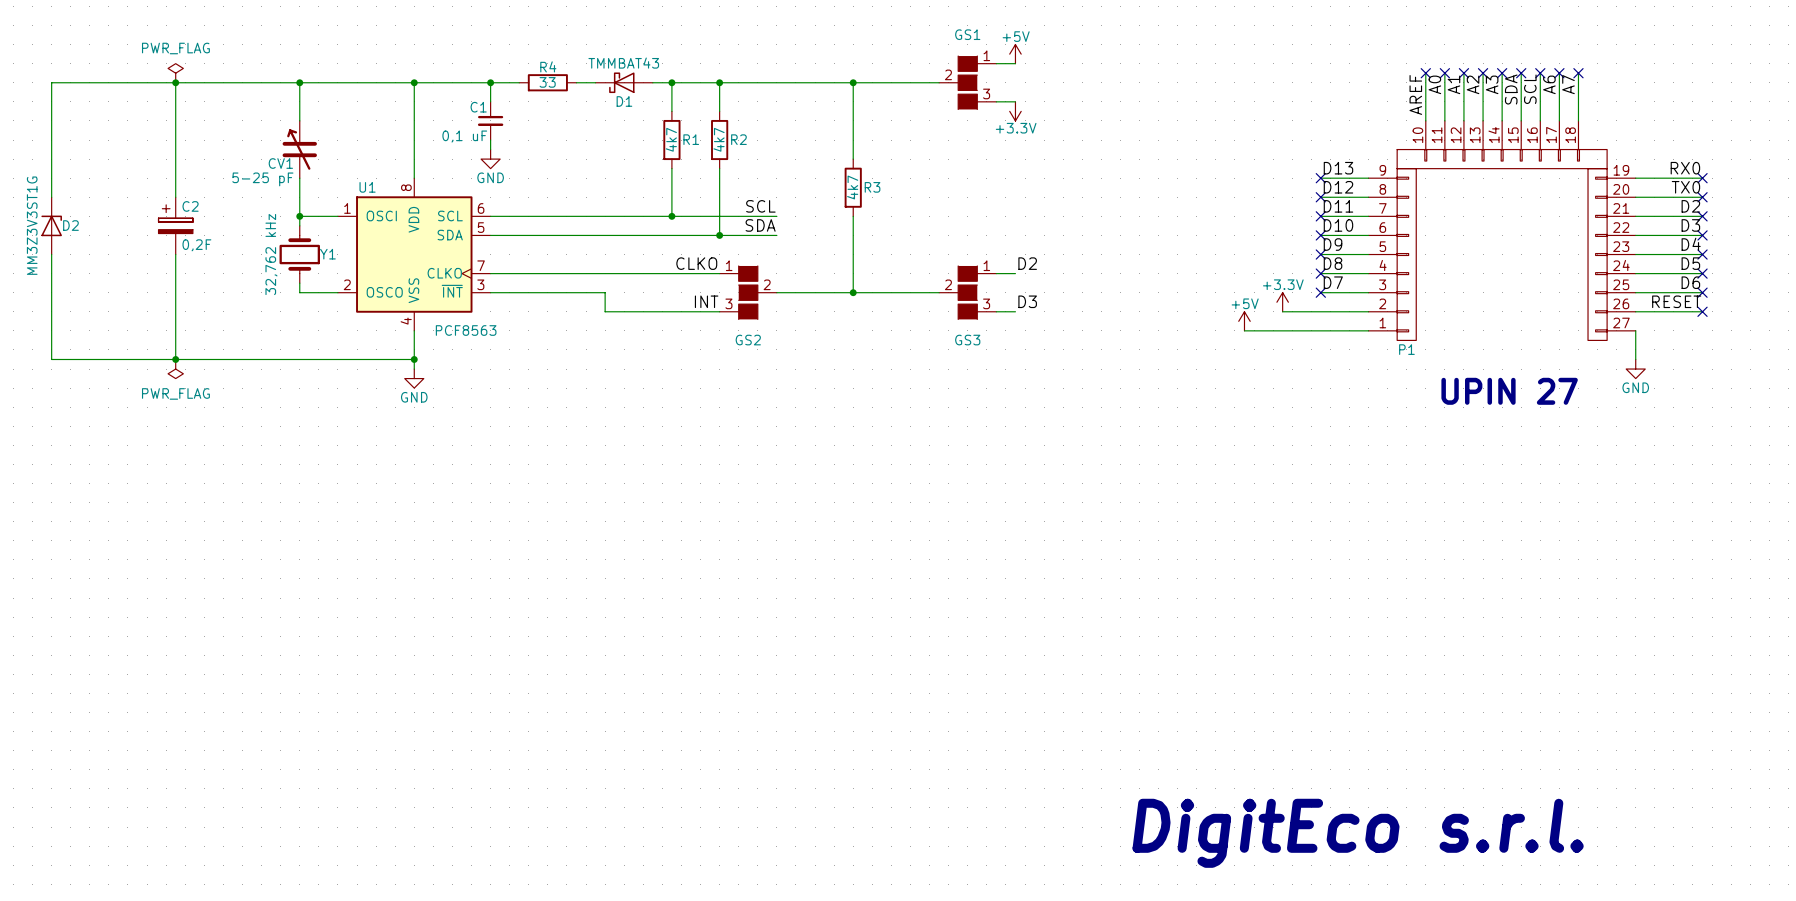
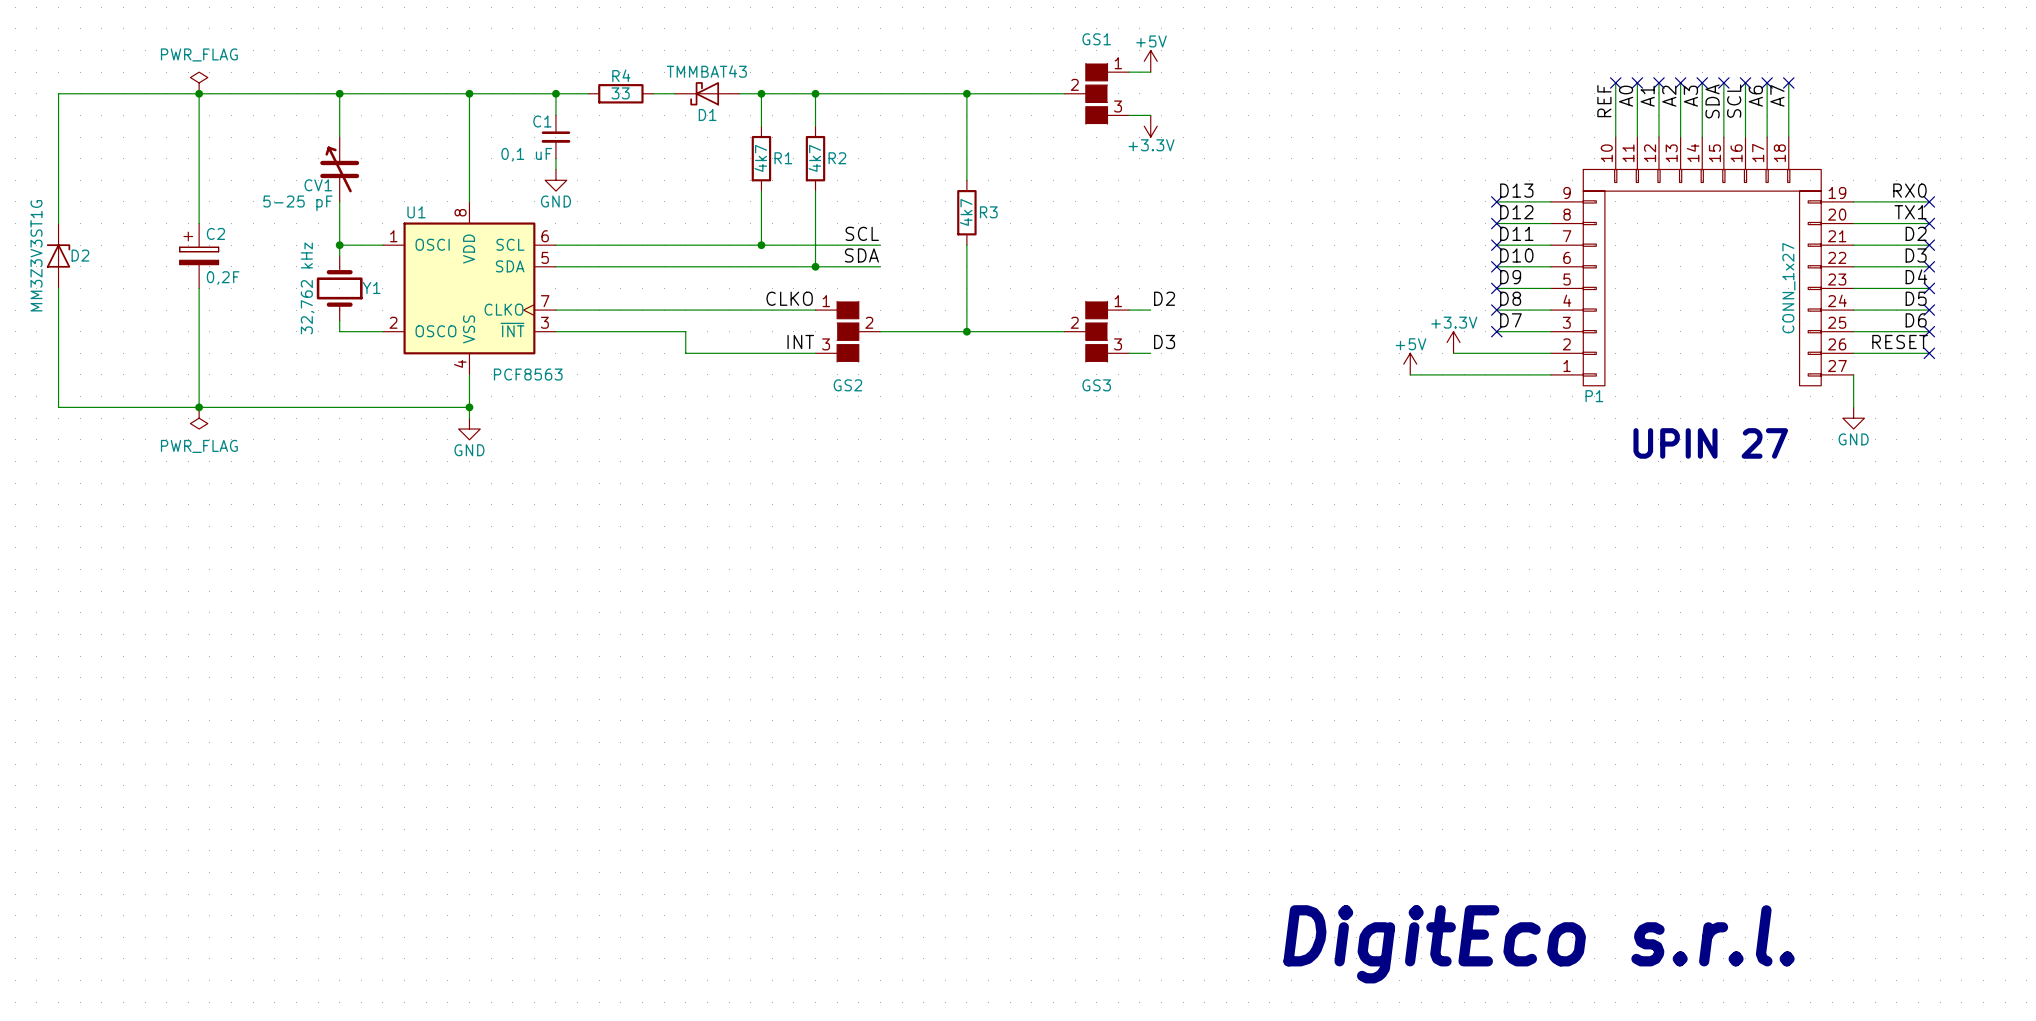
label: AREF (1415, 94) -> REF (1604, 101)
label: TX0 (1685, 187) -> TX1 (1910, 212)
P1 value: none -> CONN_1x27 (1788, 288)

